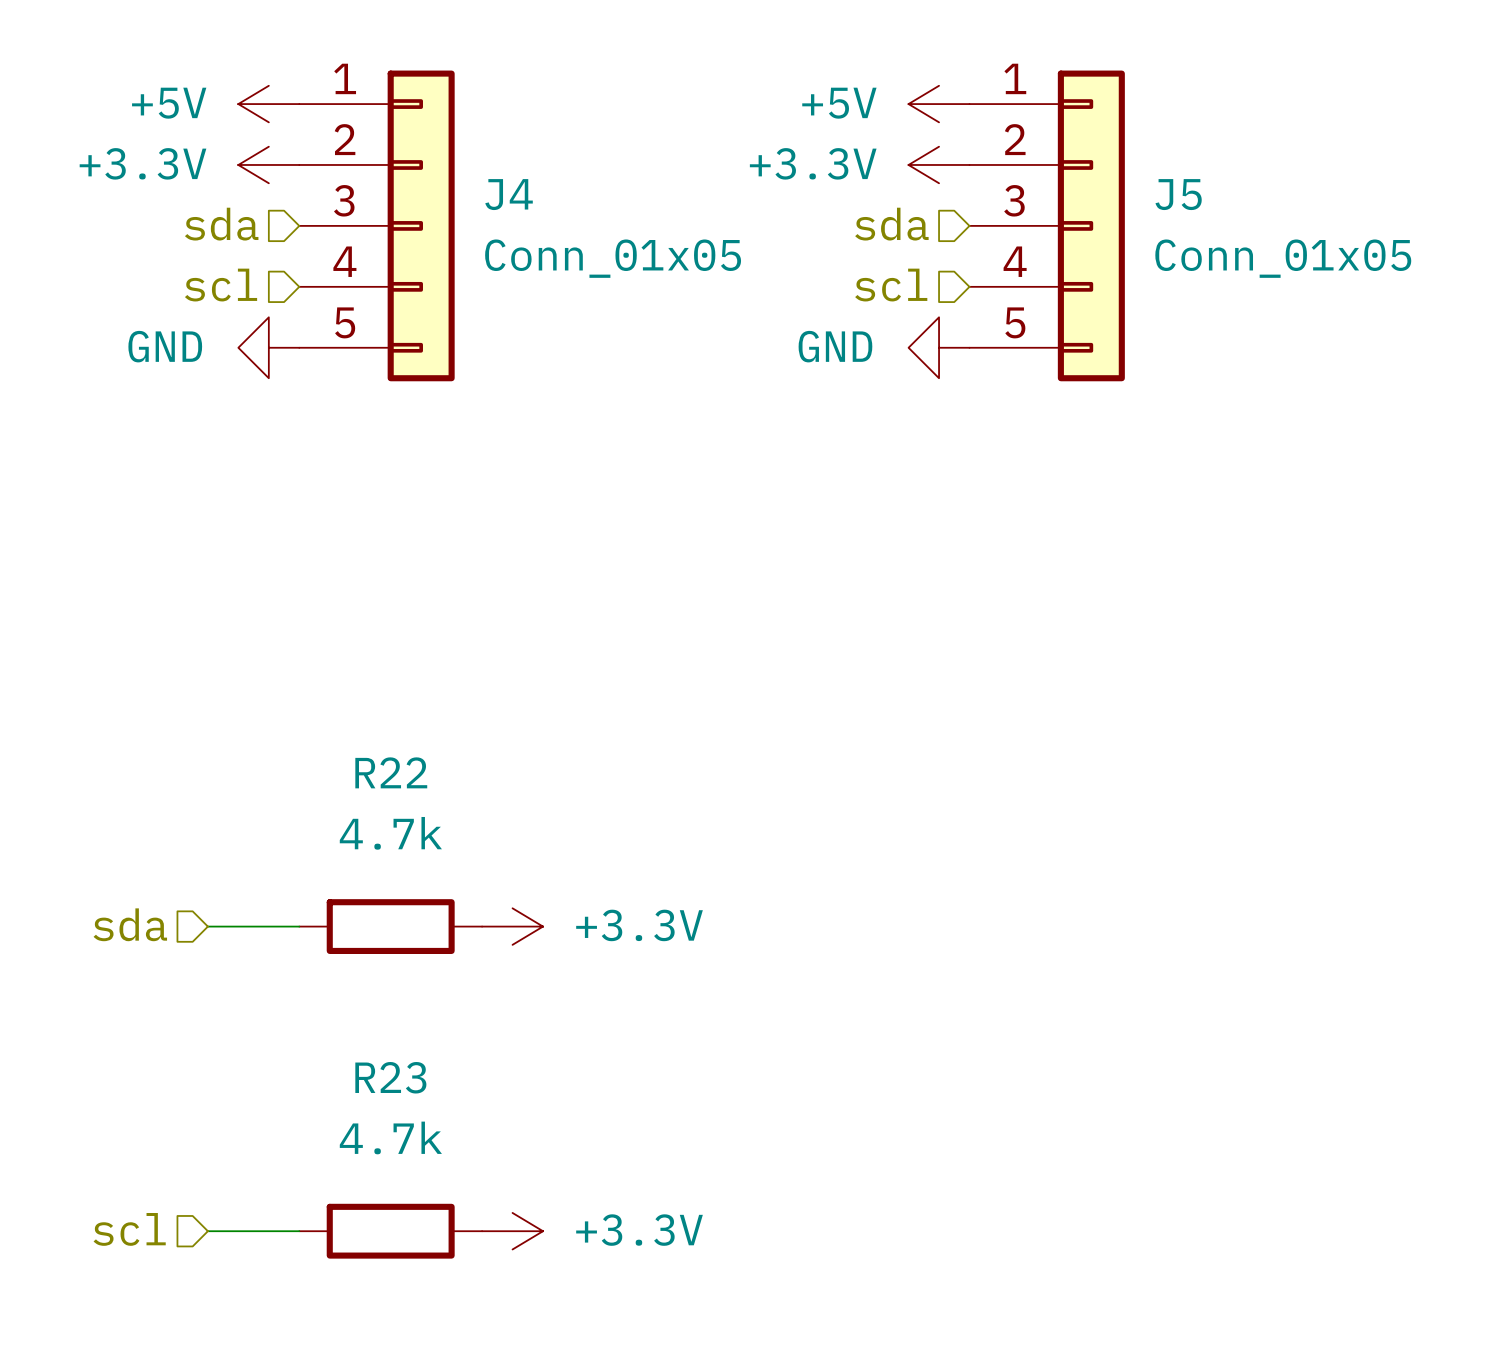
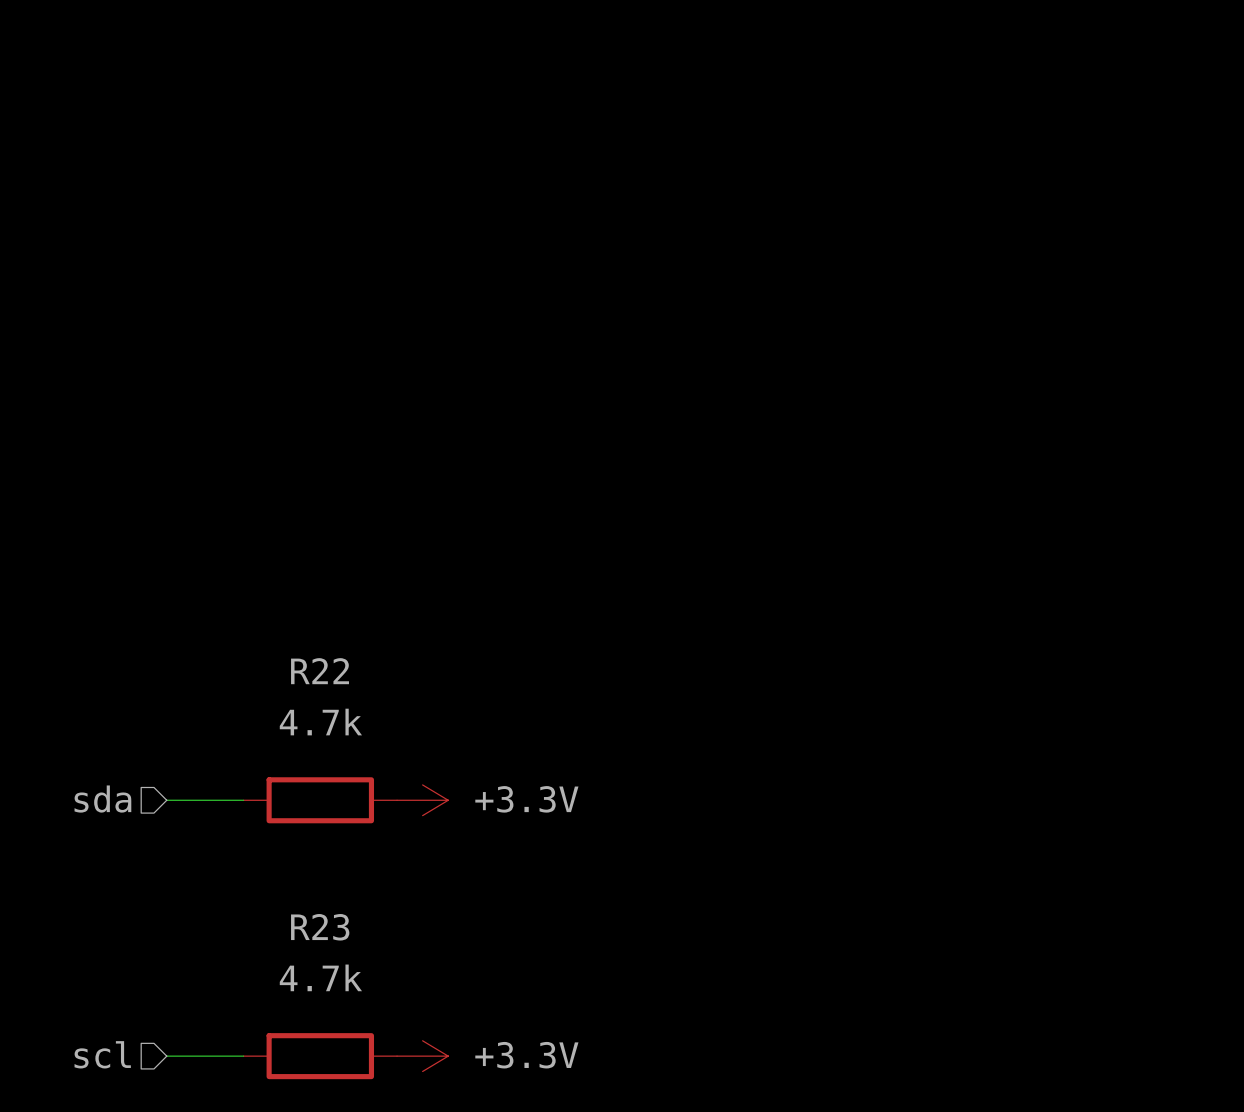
power symbol: +5V (268, 104) -> none
power symbol: +5V (939, 104) -> none
power symbol: +3.3V (268, 164) -> none
power symbol: +3.3V (939, 164) -> none
hierarchical label: sda (221, 224) -> none
hierarchical label: sda (891, 224) -> none
J4: Conn_01x05 (376, 225) -> none
J5: Conn_01x05 (1047, 225) -> none
hierarchical label: scl (221, 285) -> none
hierarchical label: scl (891, 285) -> none
power symbol: GND (268, 347) -> none
power symbol: GND (939, 347) -> none

